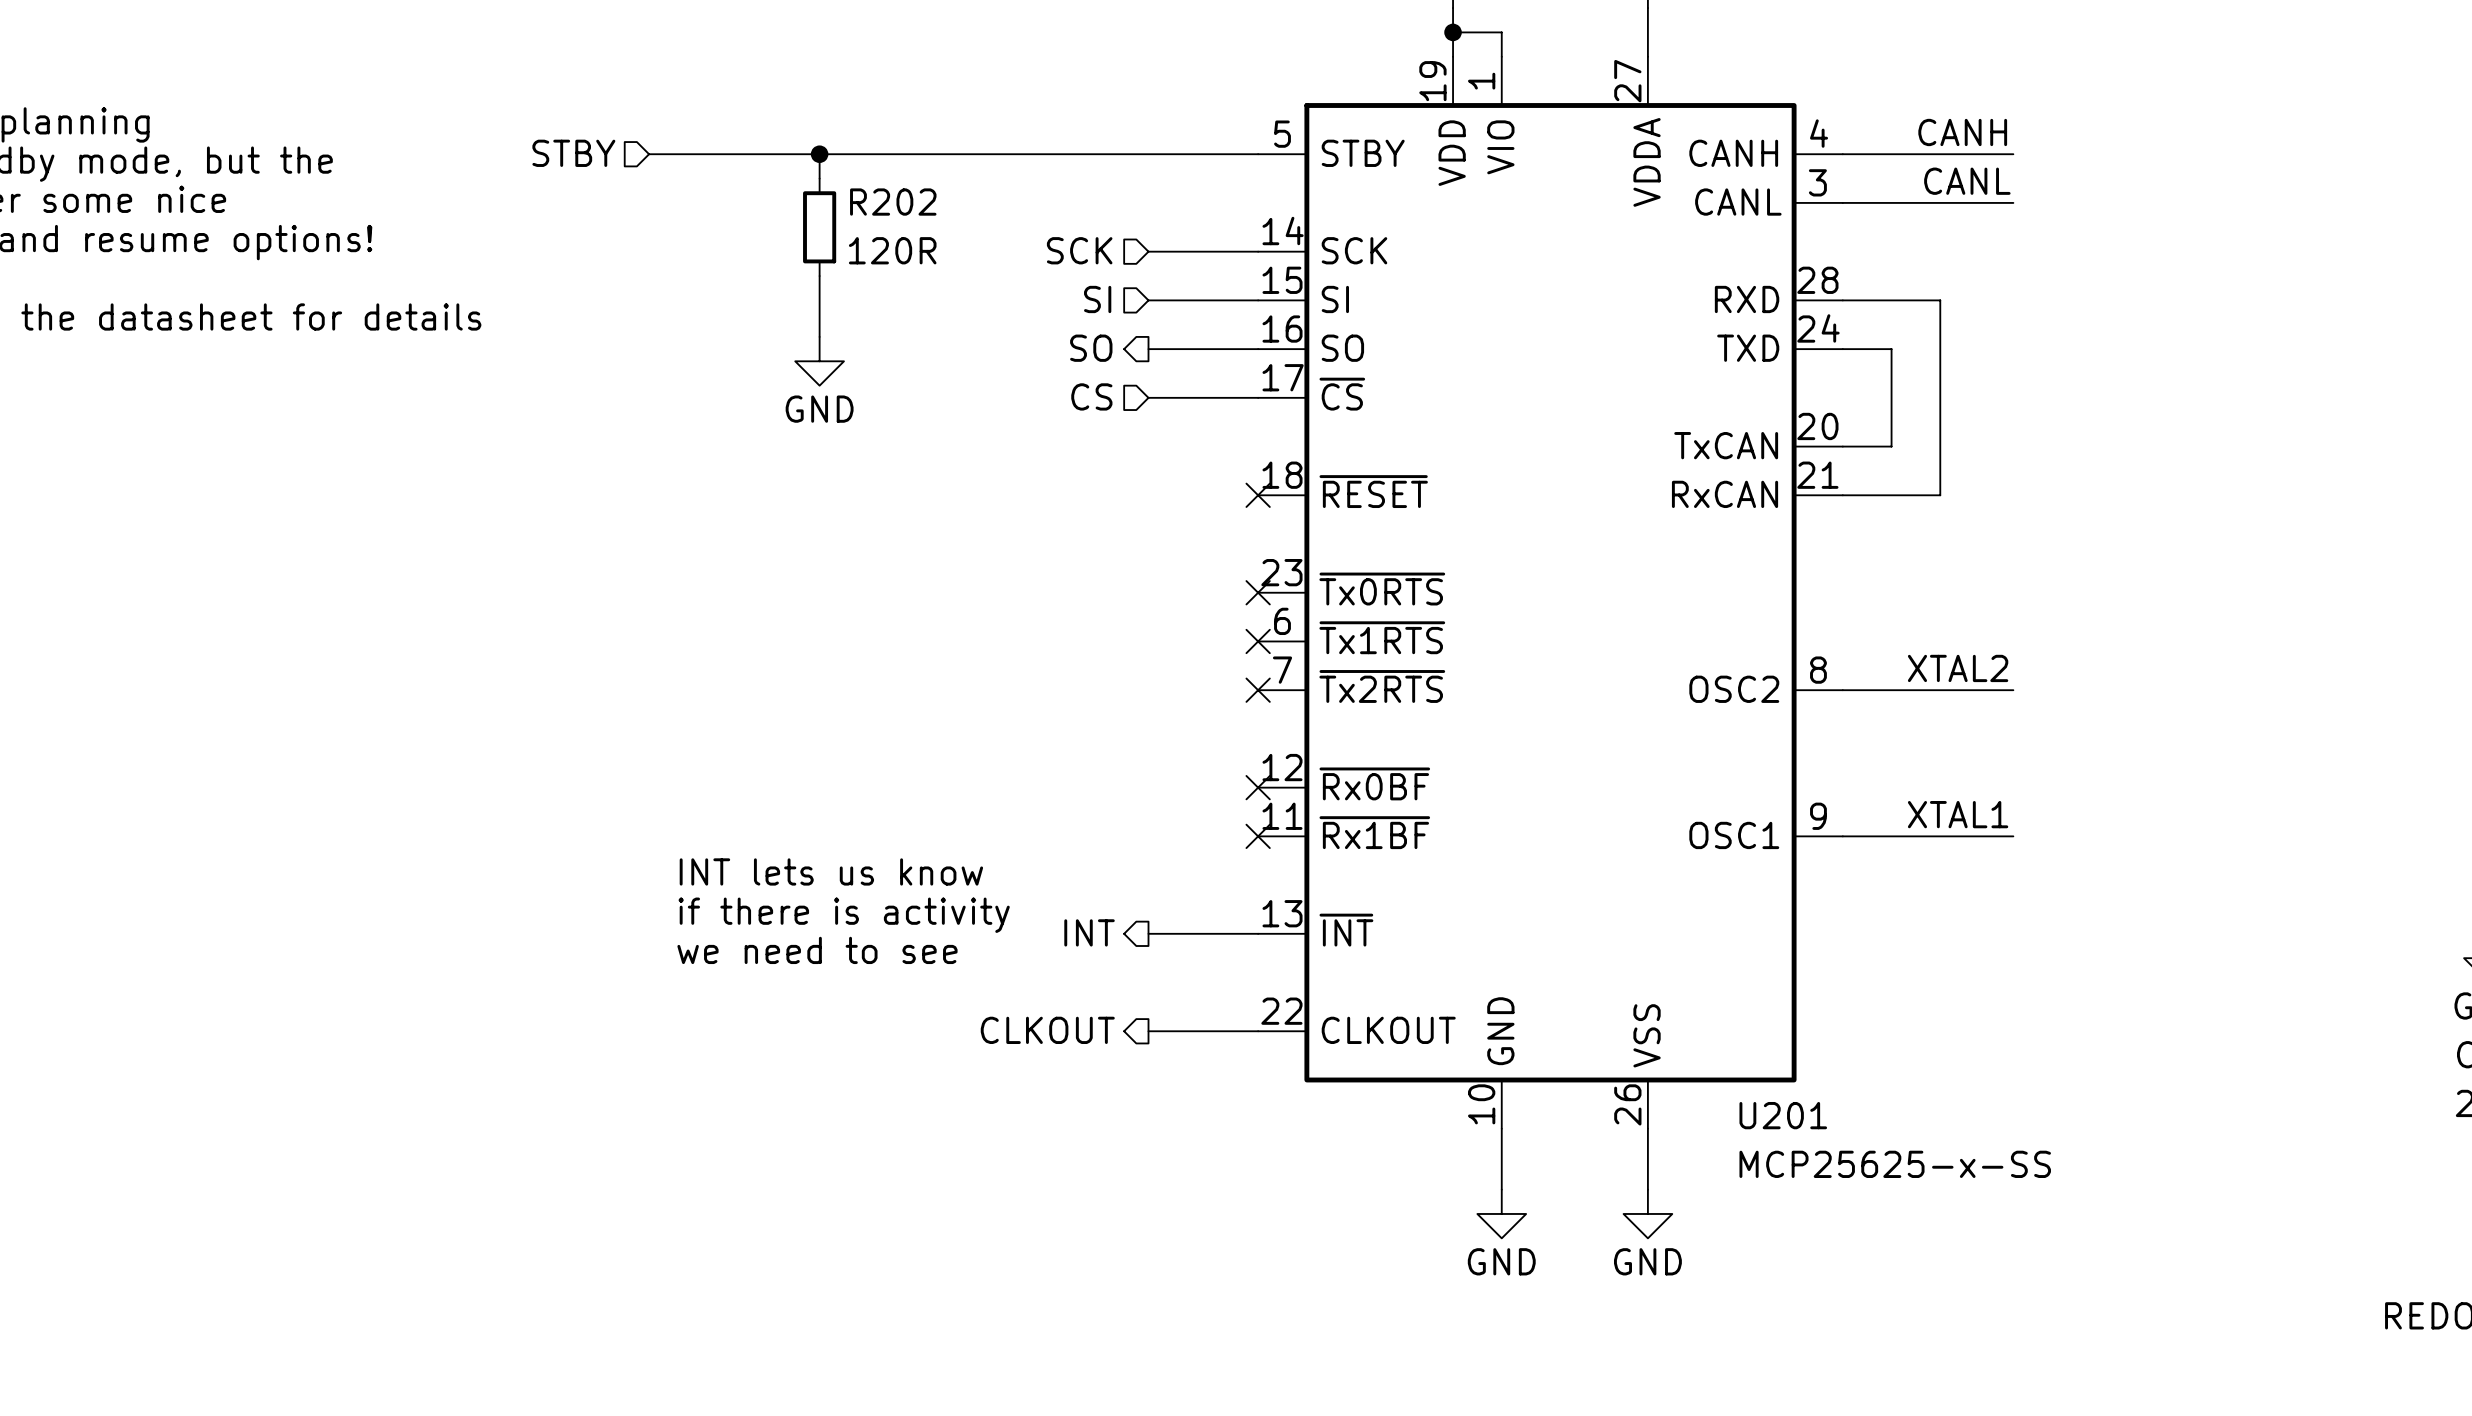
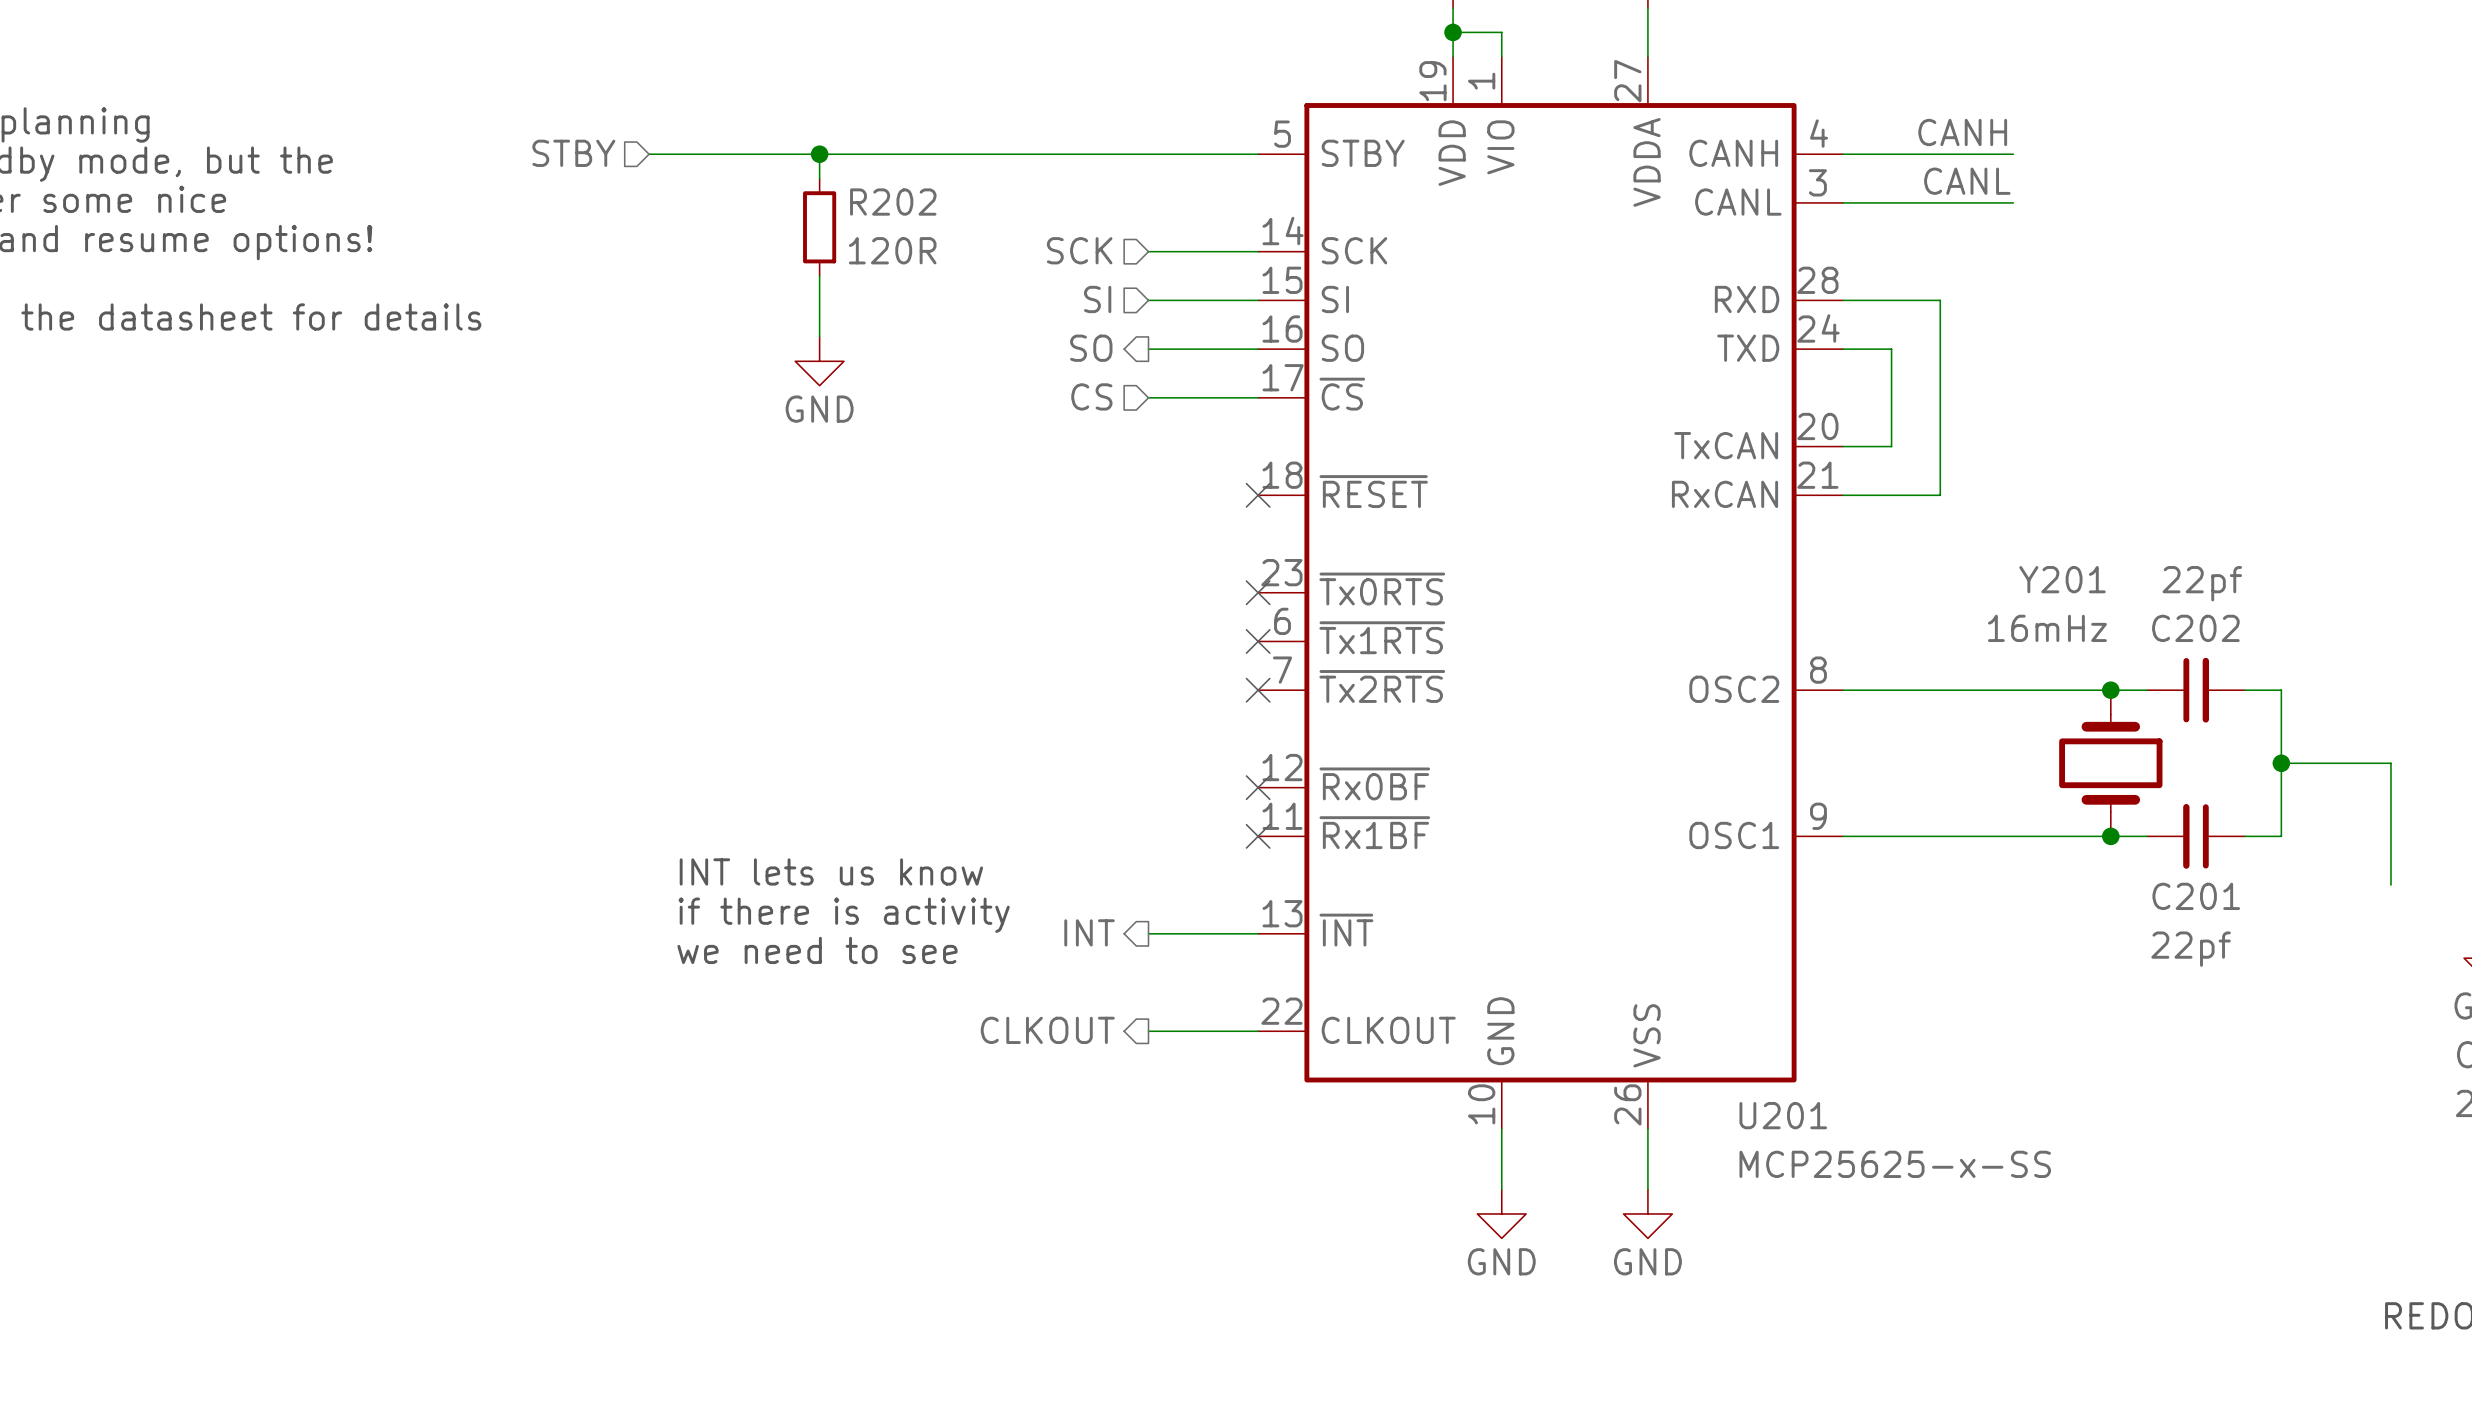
label: XTAL2 (1958, 668) -> none
wire: none -> (2013, 690) (2147, 690)
junction: none -> (2110, 690)
C202: none -> 22pf (2196, 690)
wire: none -> (2244, 690) (2281, 690) (2281, 836) (2244, 836)
Y201: none -> 16mHz (2110, 763)
wire: none -> (2281, 763) (2390, 763) (2390, 885)
junction: none -> (2281, 763)
label: XTAL1 (1958, 814) -> none
wire: none -> (2013, 836) (2147, 836)
junction: none -> (2110, 836)
C201: none -> 22pf (2196, 836)

